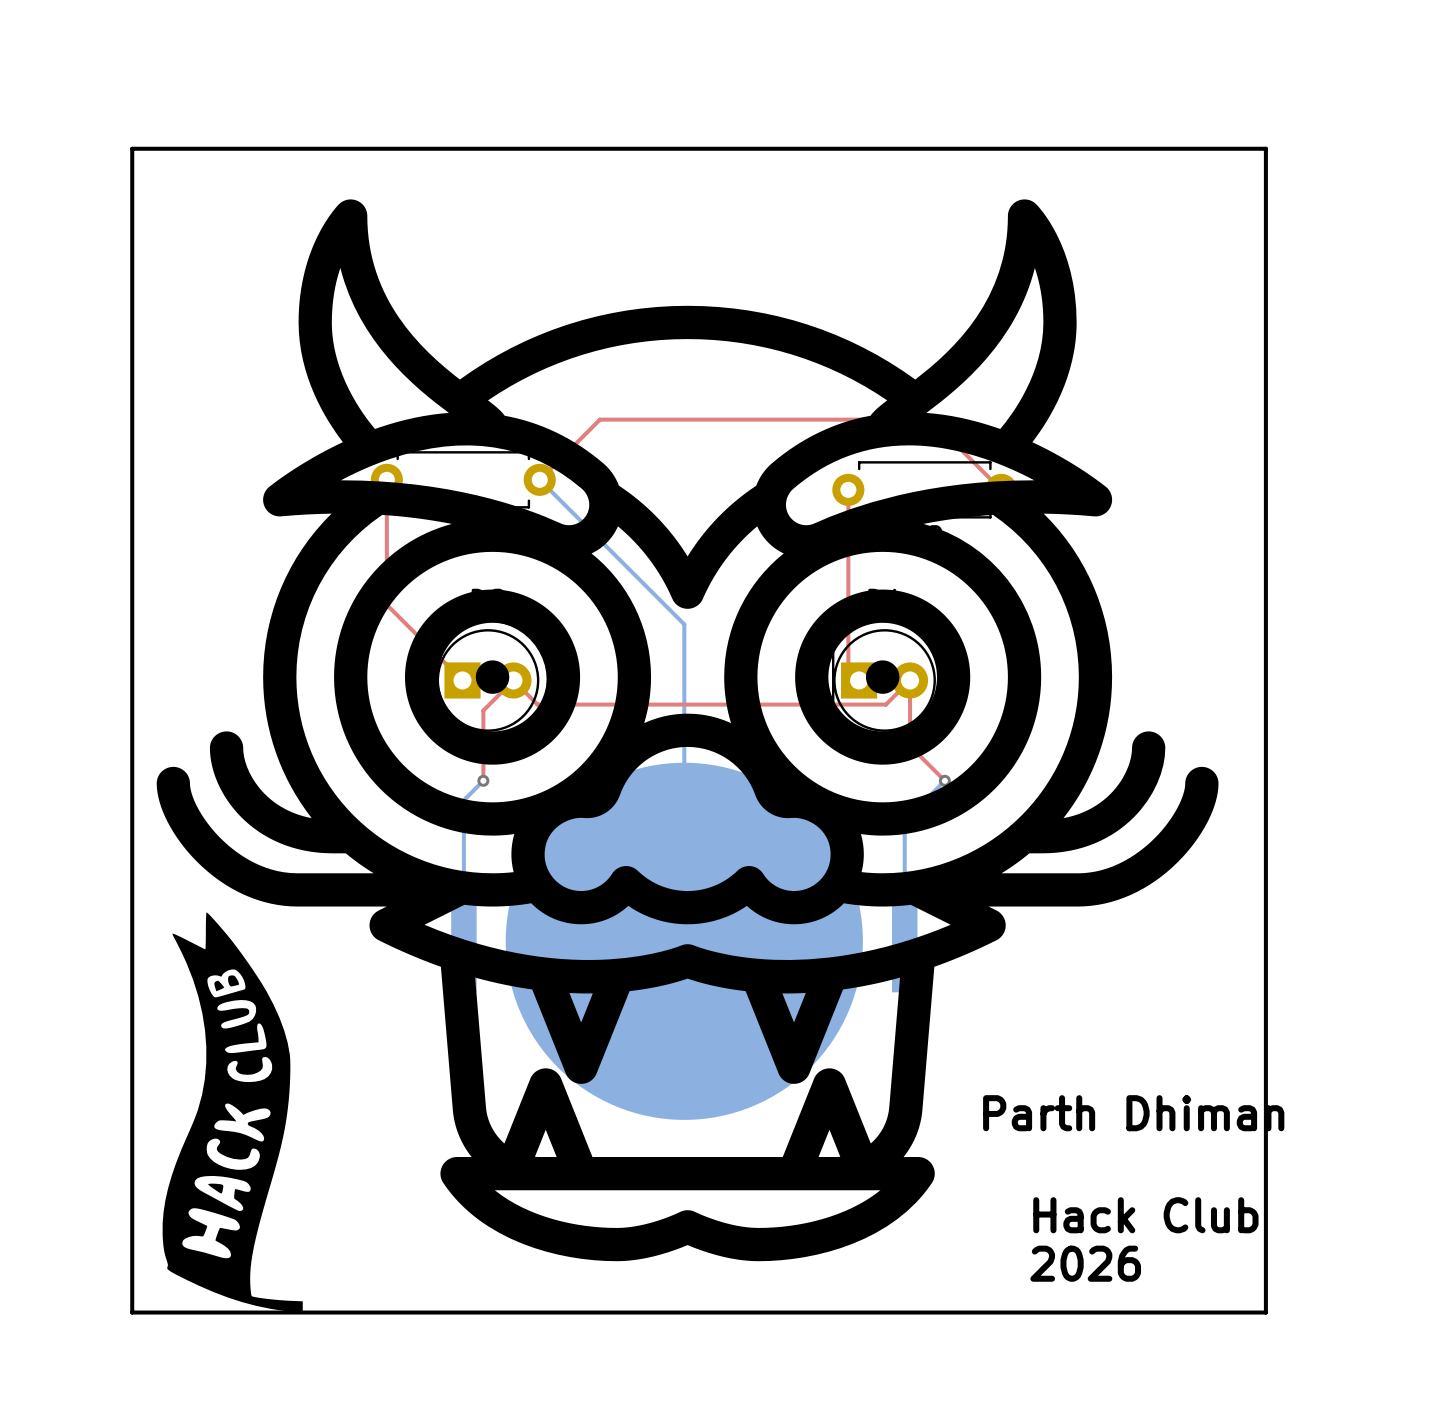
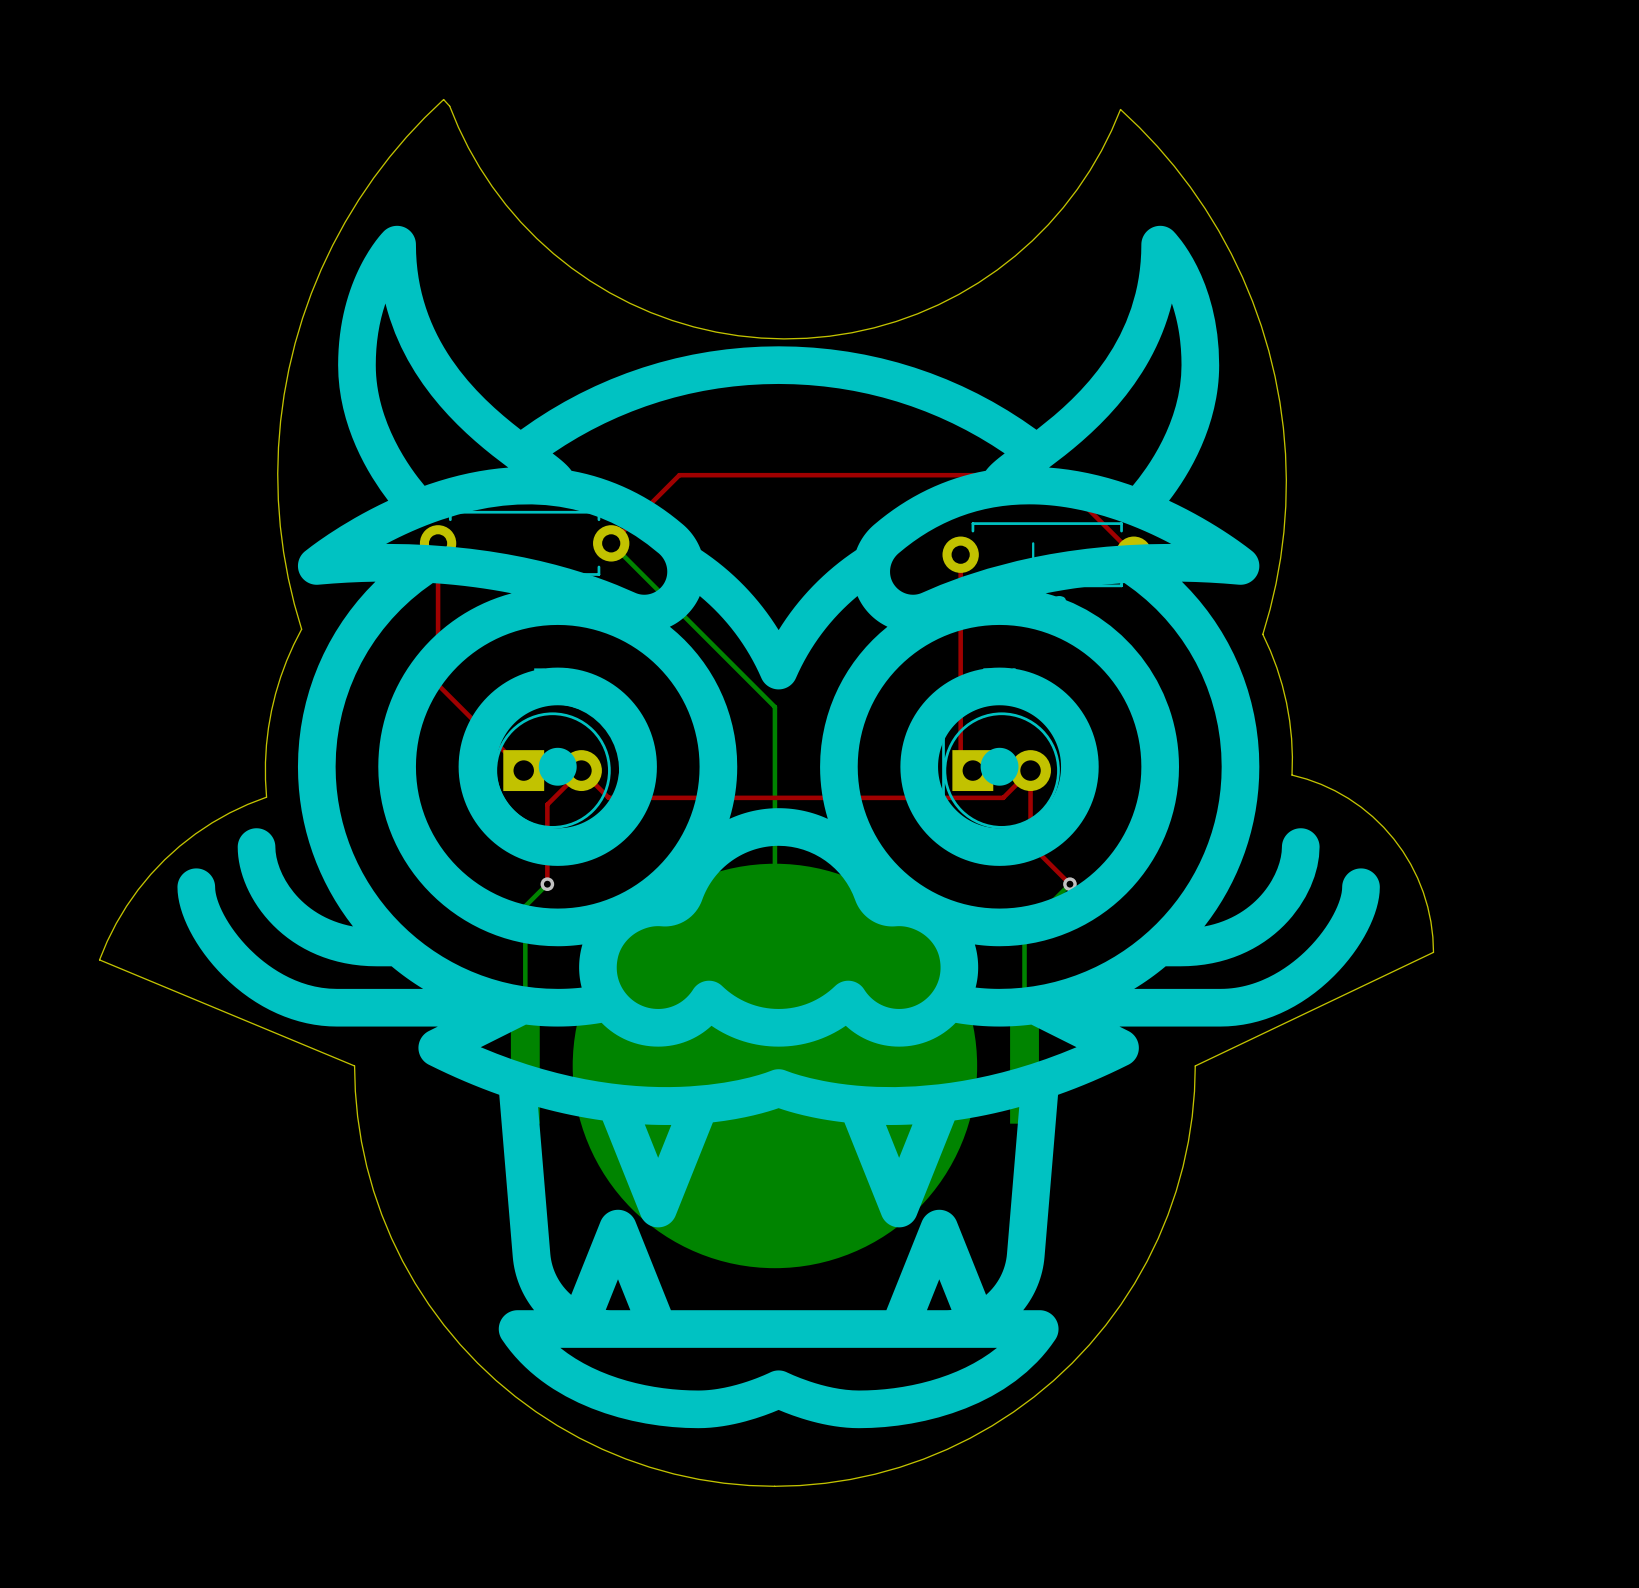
board edge: (132, 148) (1265, 148) (1265, 1312) (132, 1312) (132, 148) -> (443, 99) (389, 157) (358, 199) (321, 269) (295, 343) (280, 421) (278, 500) (288, 578) (301, 629) (280, 677) (271, 710) (265, 762) (266, 797) (212, 822) (164, 859) (126, 906) (99, 959) (354, 1065) (357, 1116) (361, 1141) (373, 1190) (391, 1238) (415, 1283) (443, 1325) (477, 1363) (515, 1396) (557, 1425) (602, 1449) (625, 1458) (674, 1474) (723, 1483) (774, 1486) (825, 1483) (850, 1479) (899, 1467) (923, 1459) (970, 1438) (1013, 1412) (1053, 1380) (1089, 1344) (1105, 1325) (1134, 1283) (1147, 1261) (1167, 1215) (1183, 1166) (1188, 1141) (1194, 1091) (1195, 1065) (1433, 952) (1430, 921) (1423, 892) (1410, 864) (1393, 838) (1372, 816) (1348, 798) (1321, 784) (1292, 775) (1291, 738) (1286, 702) (1276, 667) (1262, 634) (1280, 558) (1286, 480) (1279, 402) (1261, 326) (1231, 253) (1205, 208) (1157, 146) (1120, 109) (1089, 170) (1063, 207) (1032, 240) (978, 282) (938, 304) (874, 327) (829, 336) (783, 338) (716, 332) (672, 320) (609, 292) (571, 267) (536, 238) (505, 204) (479, 167) (449, 106) (443, 99)
line: none -> (1033, 543) (1033, 557)
drawing: [162, 912, 303, 1313] -> none
text: Parth Dhiman (1133, 1113) -> none
text: Hack Club (1145, 1215) -> none
text: 2026 (1085, 1263) -> none

